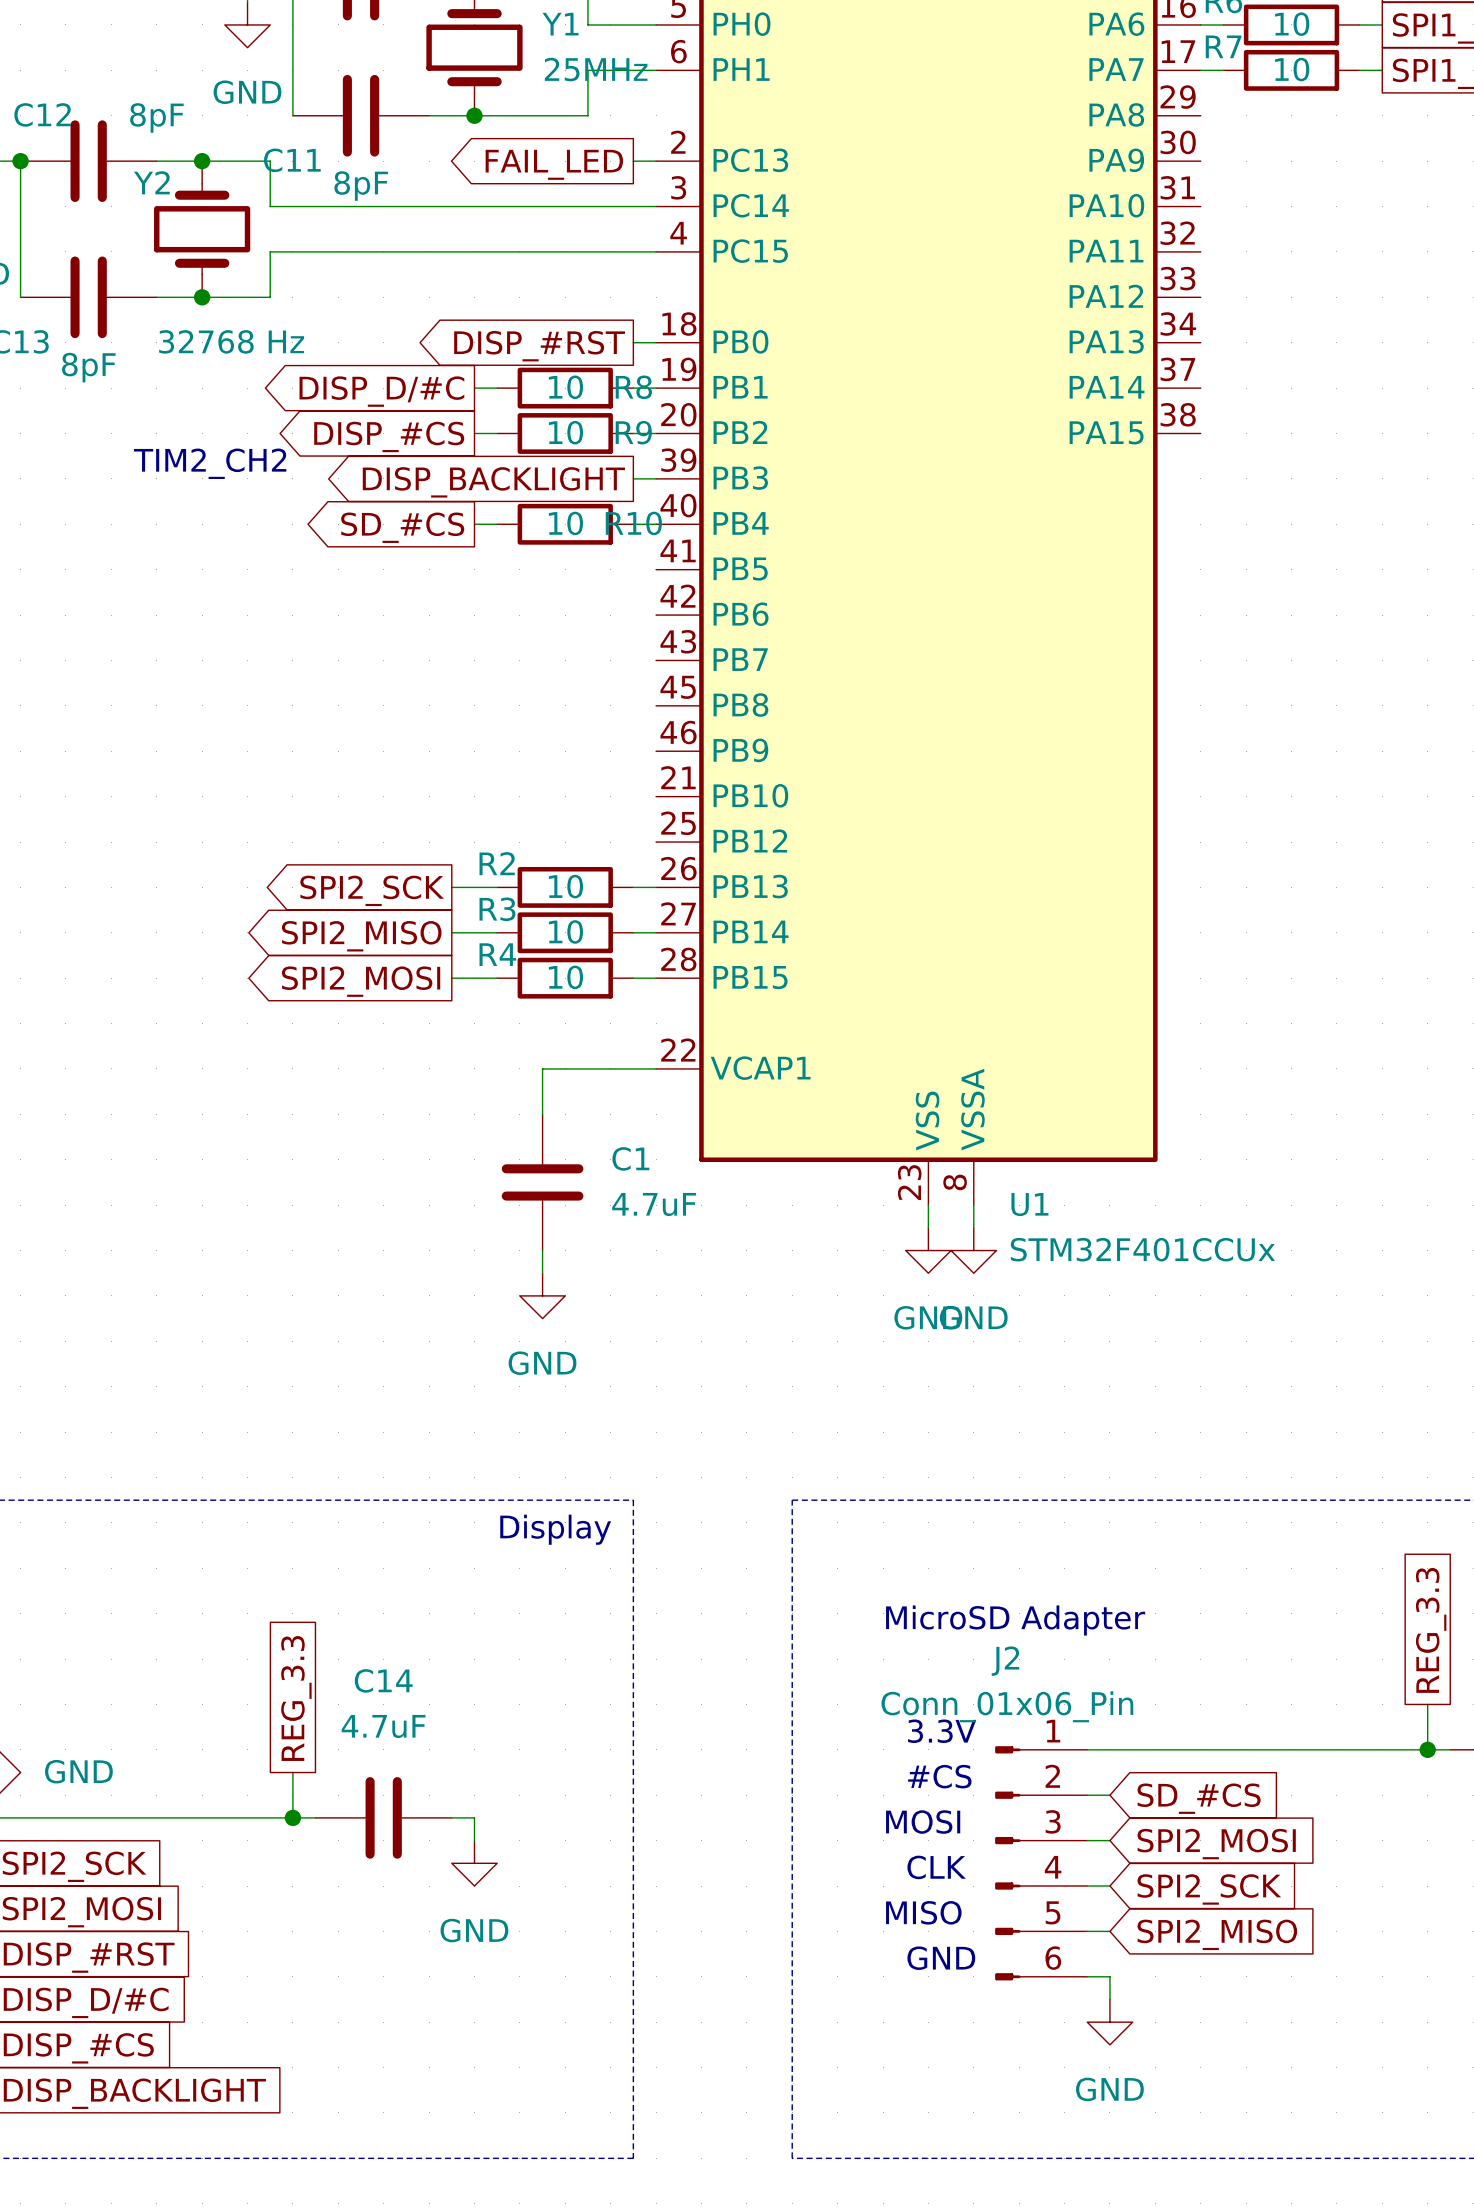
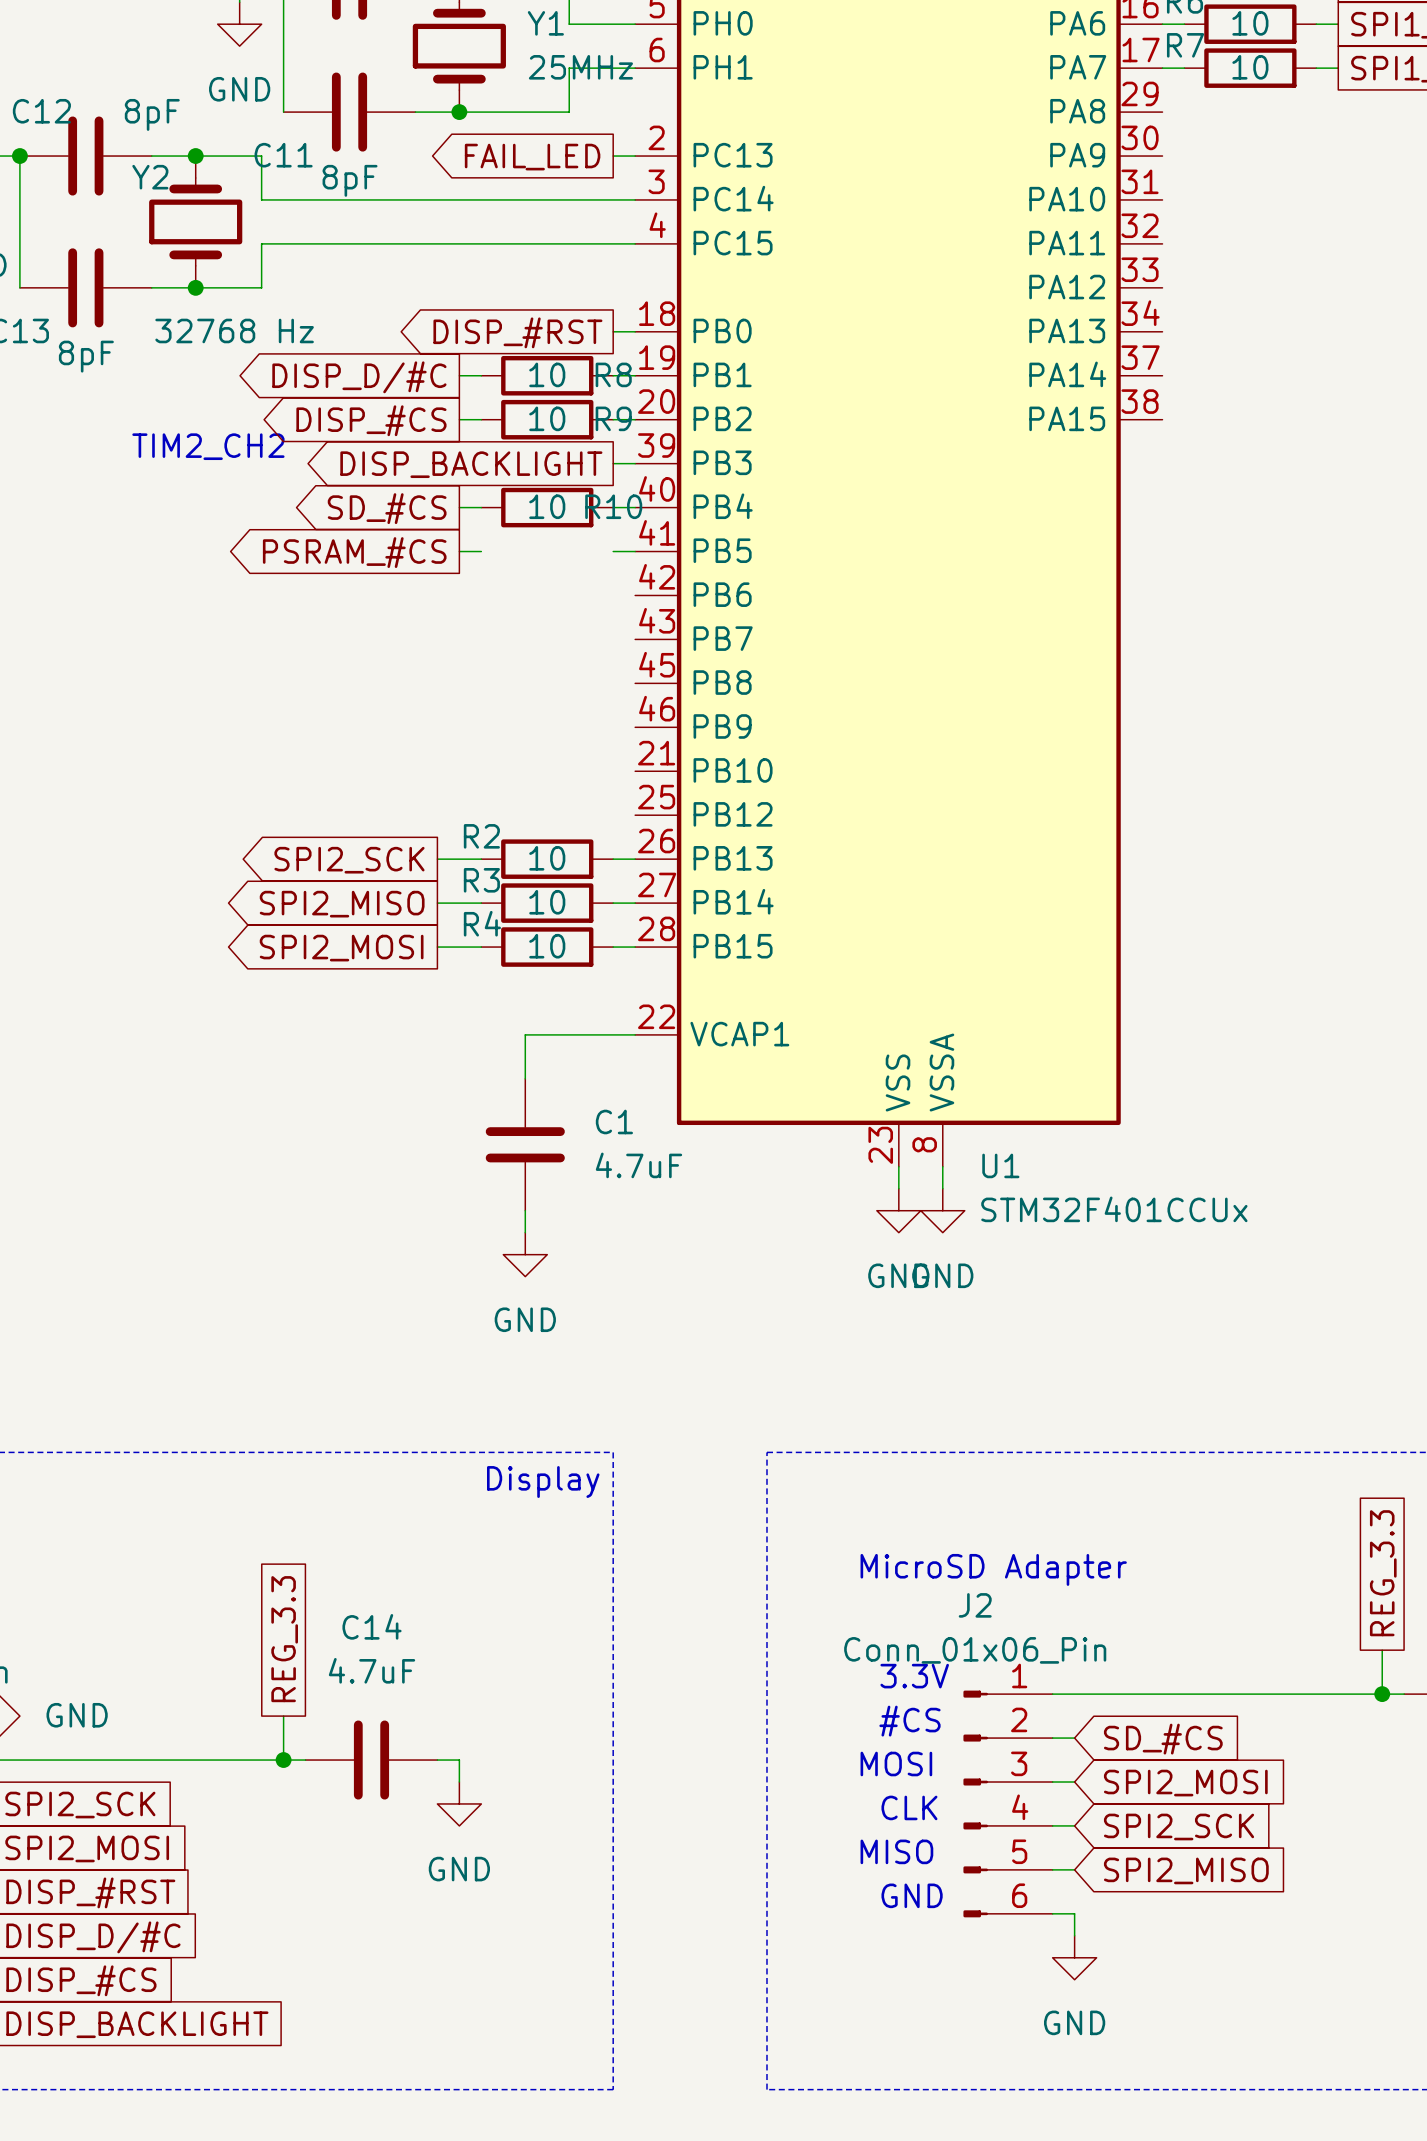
wire: none -> (459, 551) (481, 551)
wire: none -> (613, 551) (635, 551)
global label: none -> PSRAM_#CS (354, 552)

